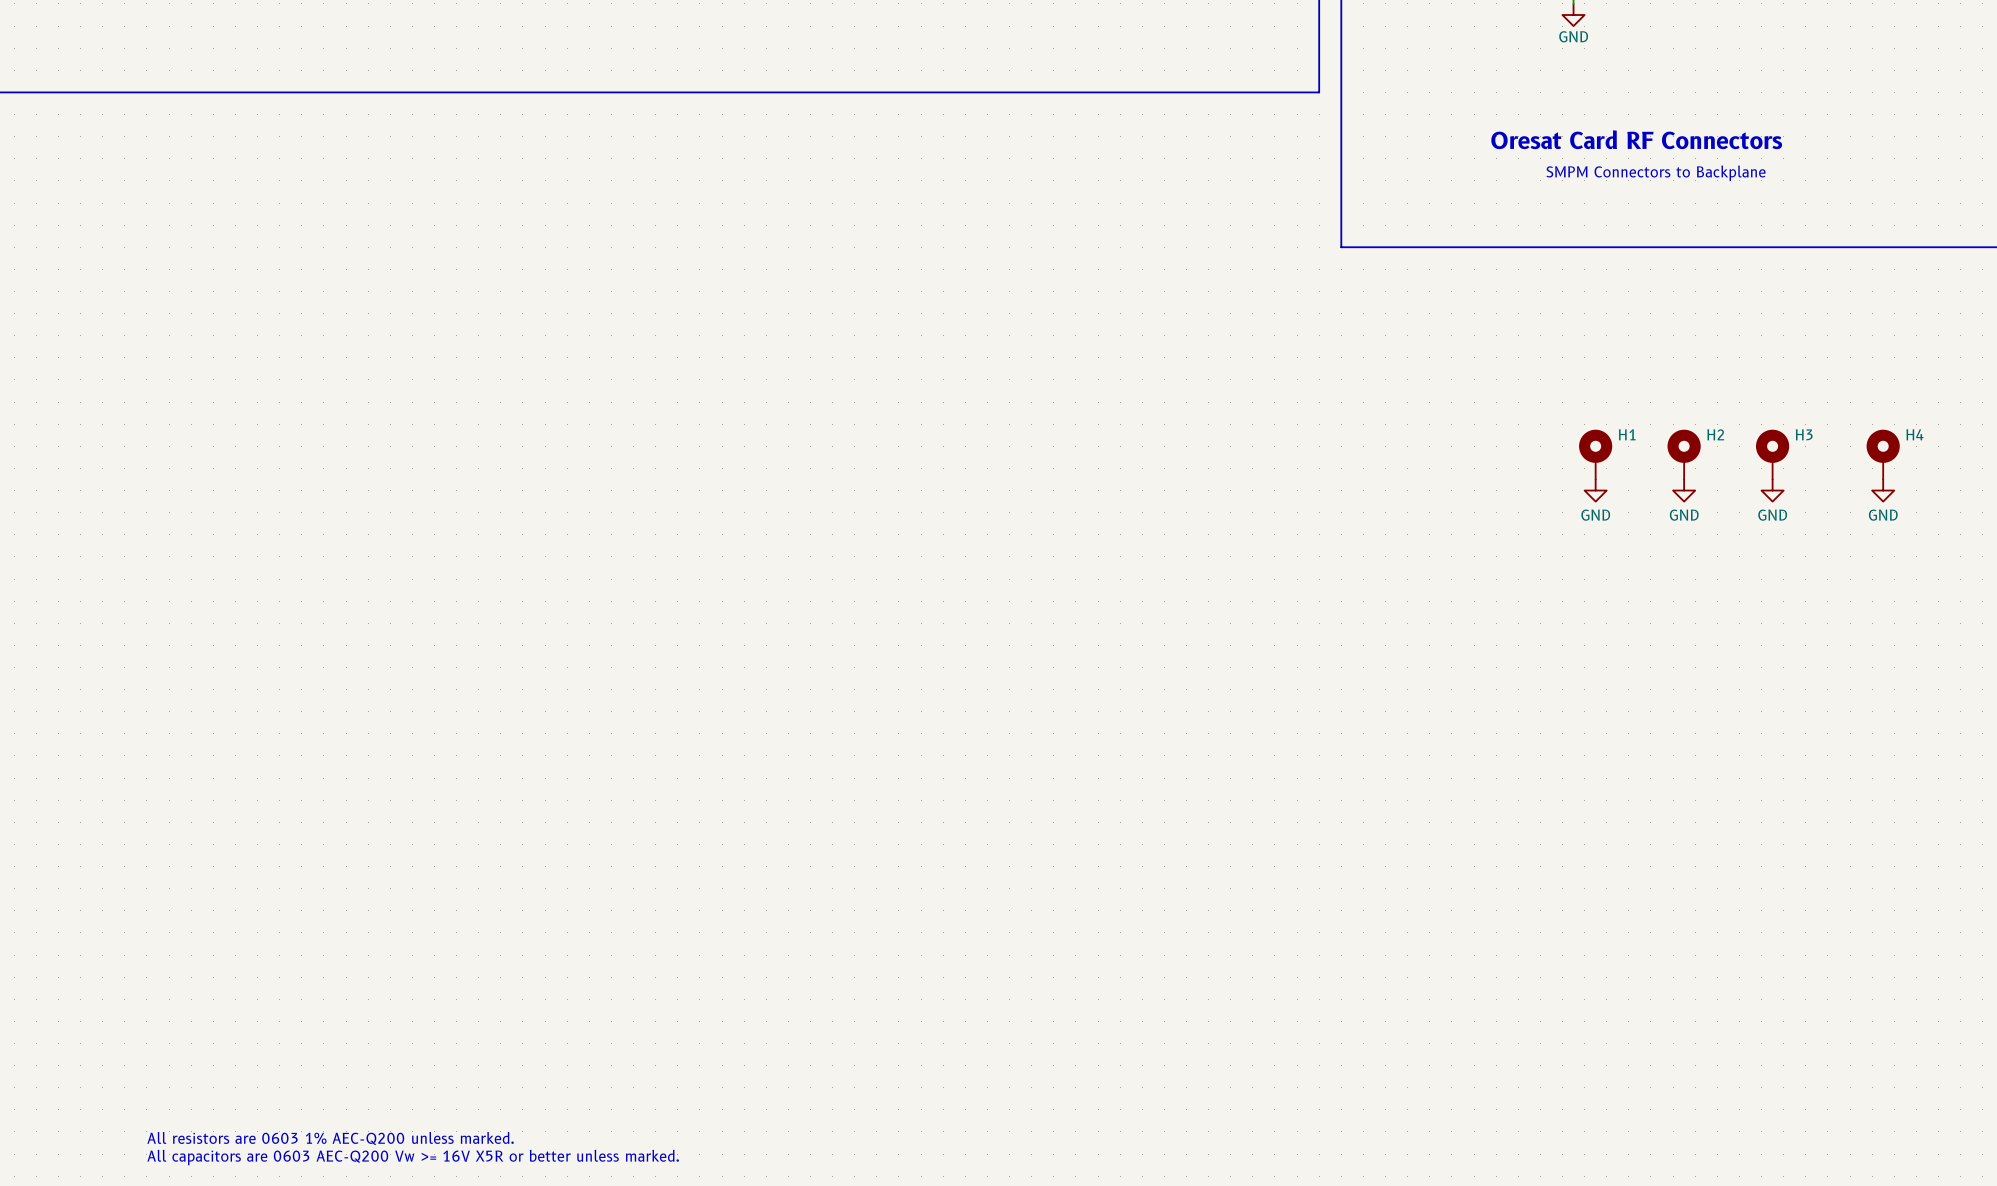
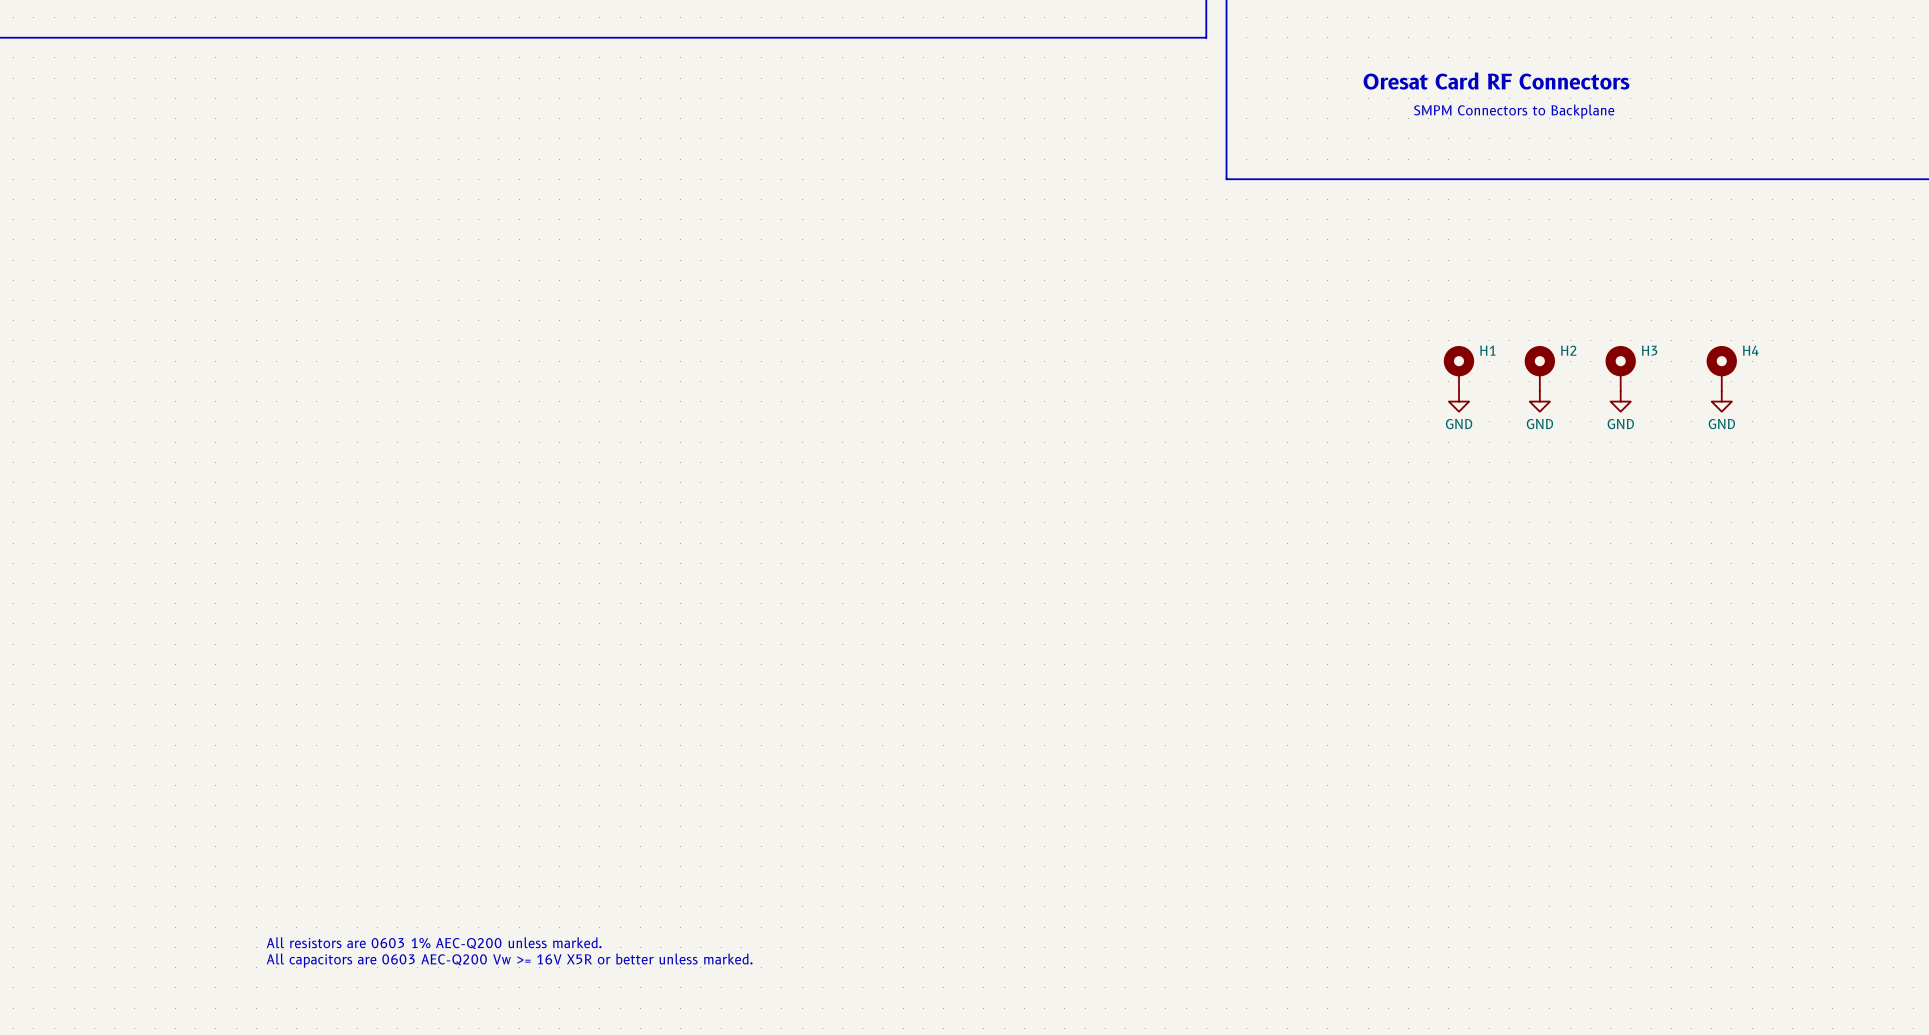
text position: All resistors are 0603 1% AEC-Q200 unless marked. (330, 1138) -> All resistors are 0603 1% AEC-Q200 unless marked. (434, 943)
text position: All capacitors are 0603 AEC-Q200 Vw >= 16V X5R or better unless marked. (413, 1157) -> All capacitors are 0603 AEC-Q200 Vw >= 16V X5R or better unless marked. (509, 960)

